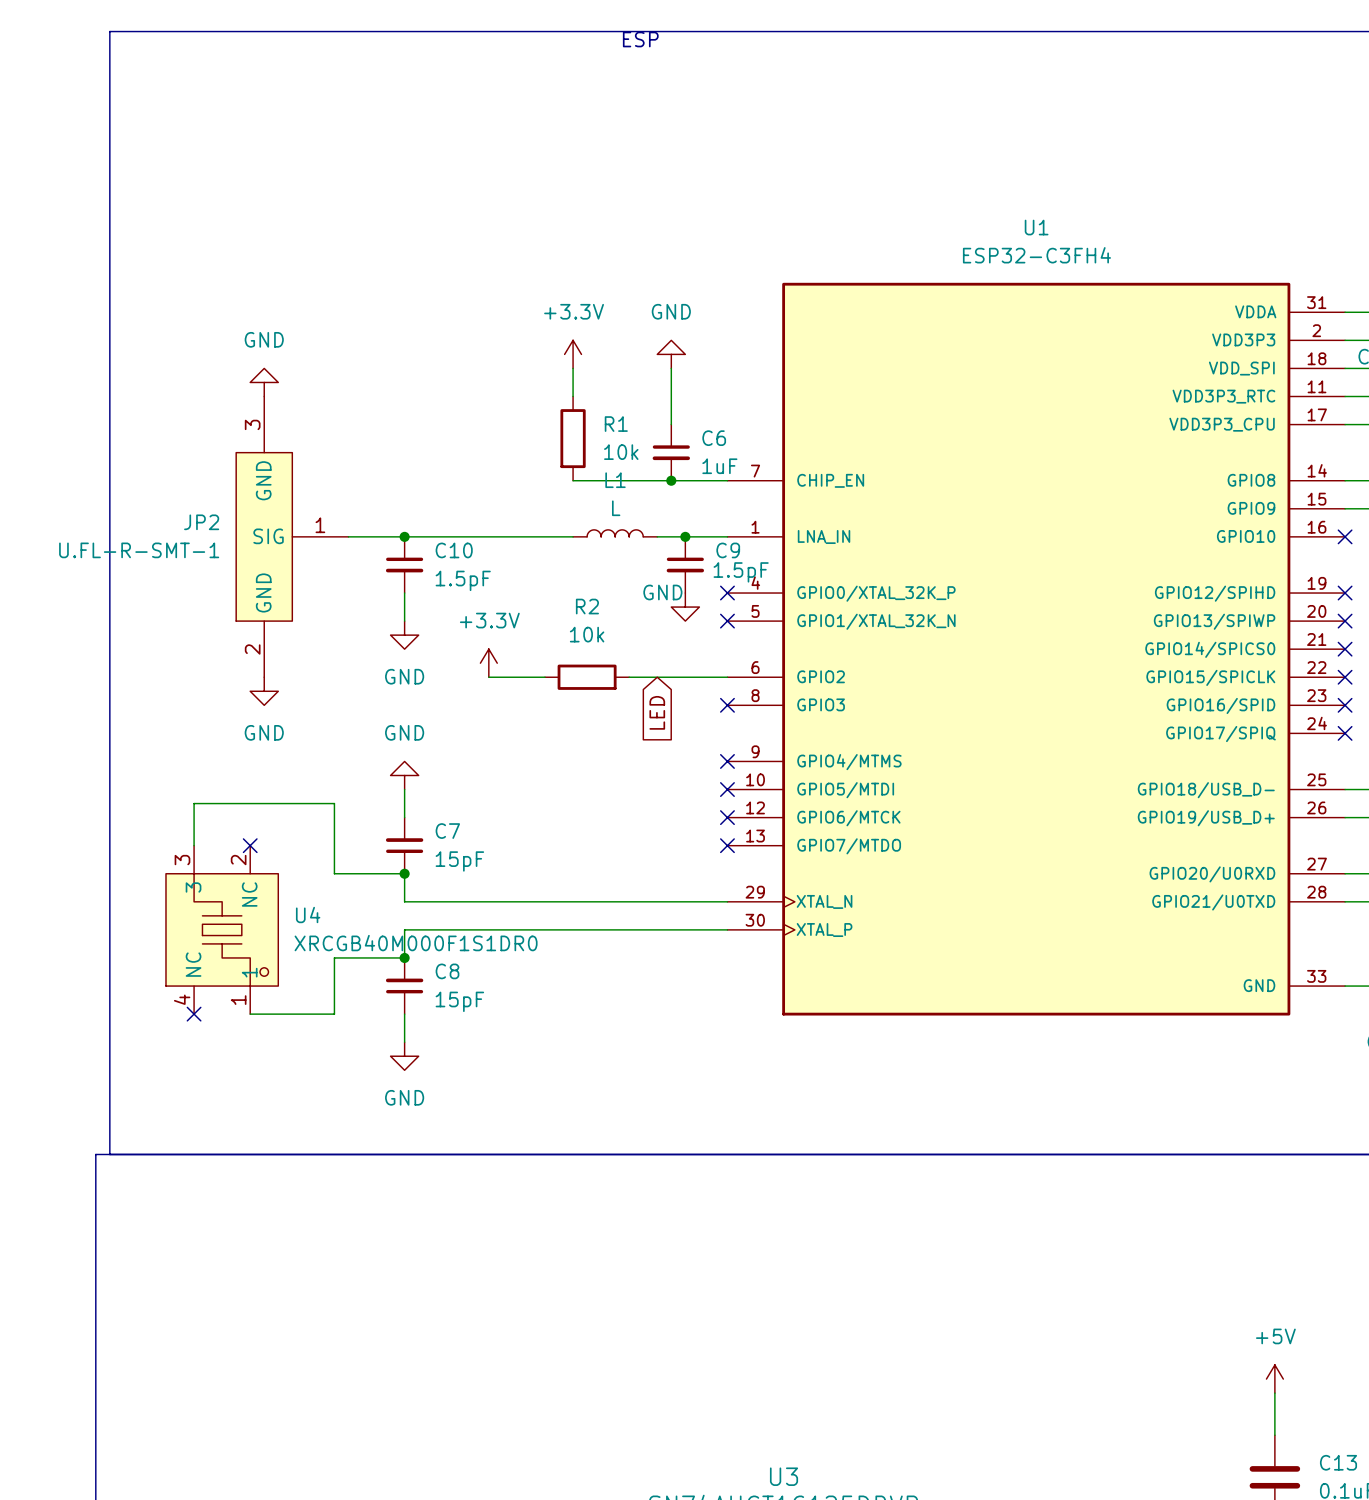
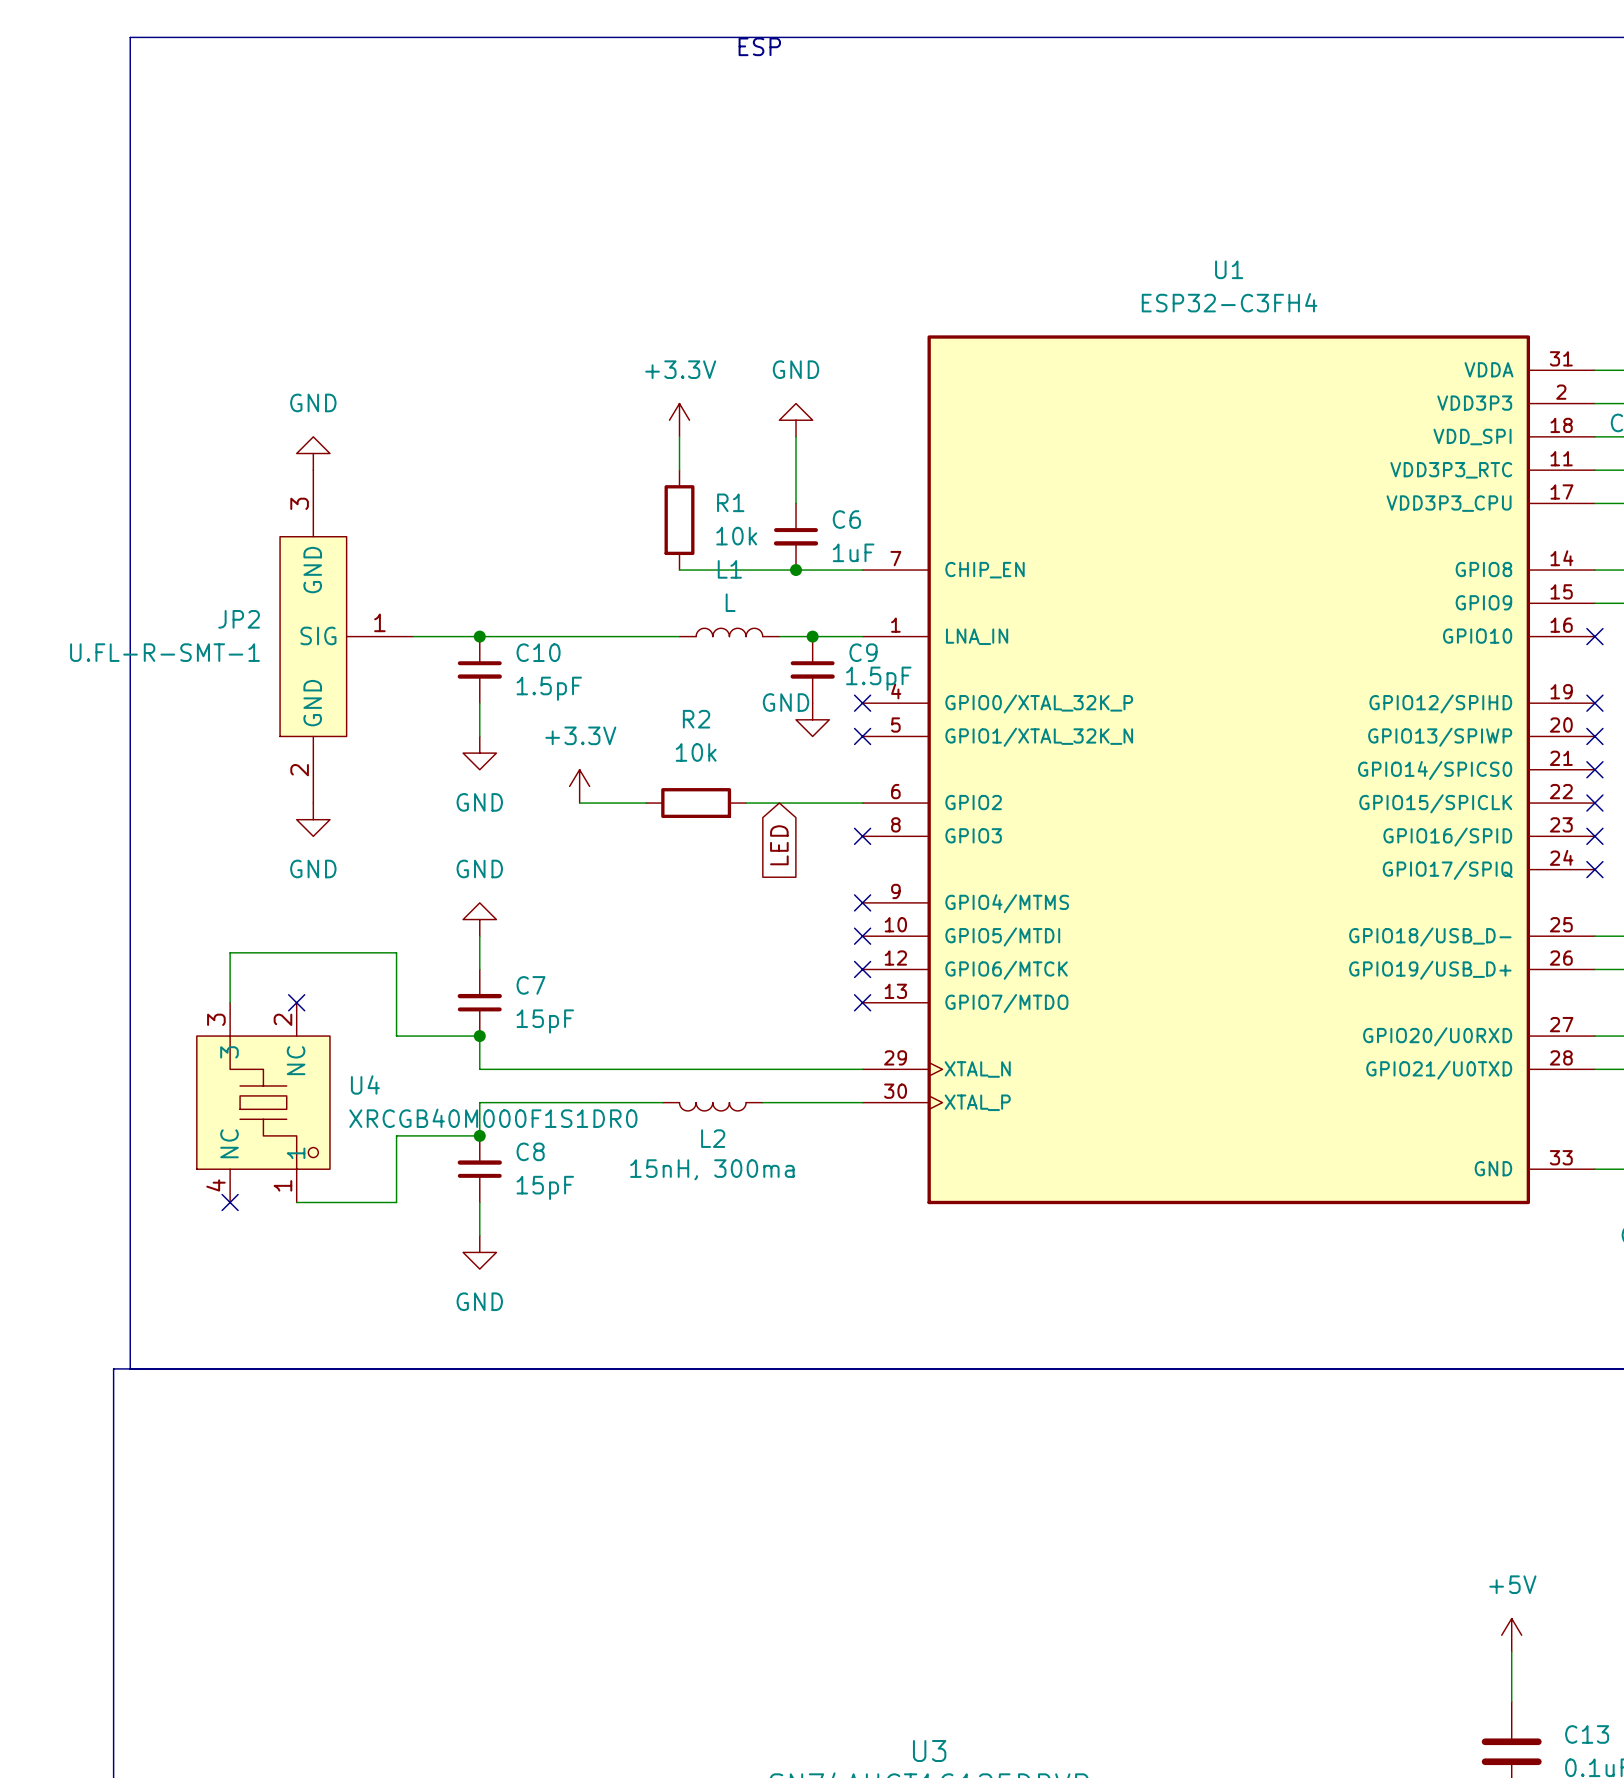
wire: (559, 929) (643, 929) -> none
L2: none -> 15nH, 300ma (712, 1106)

